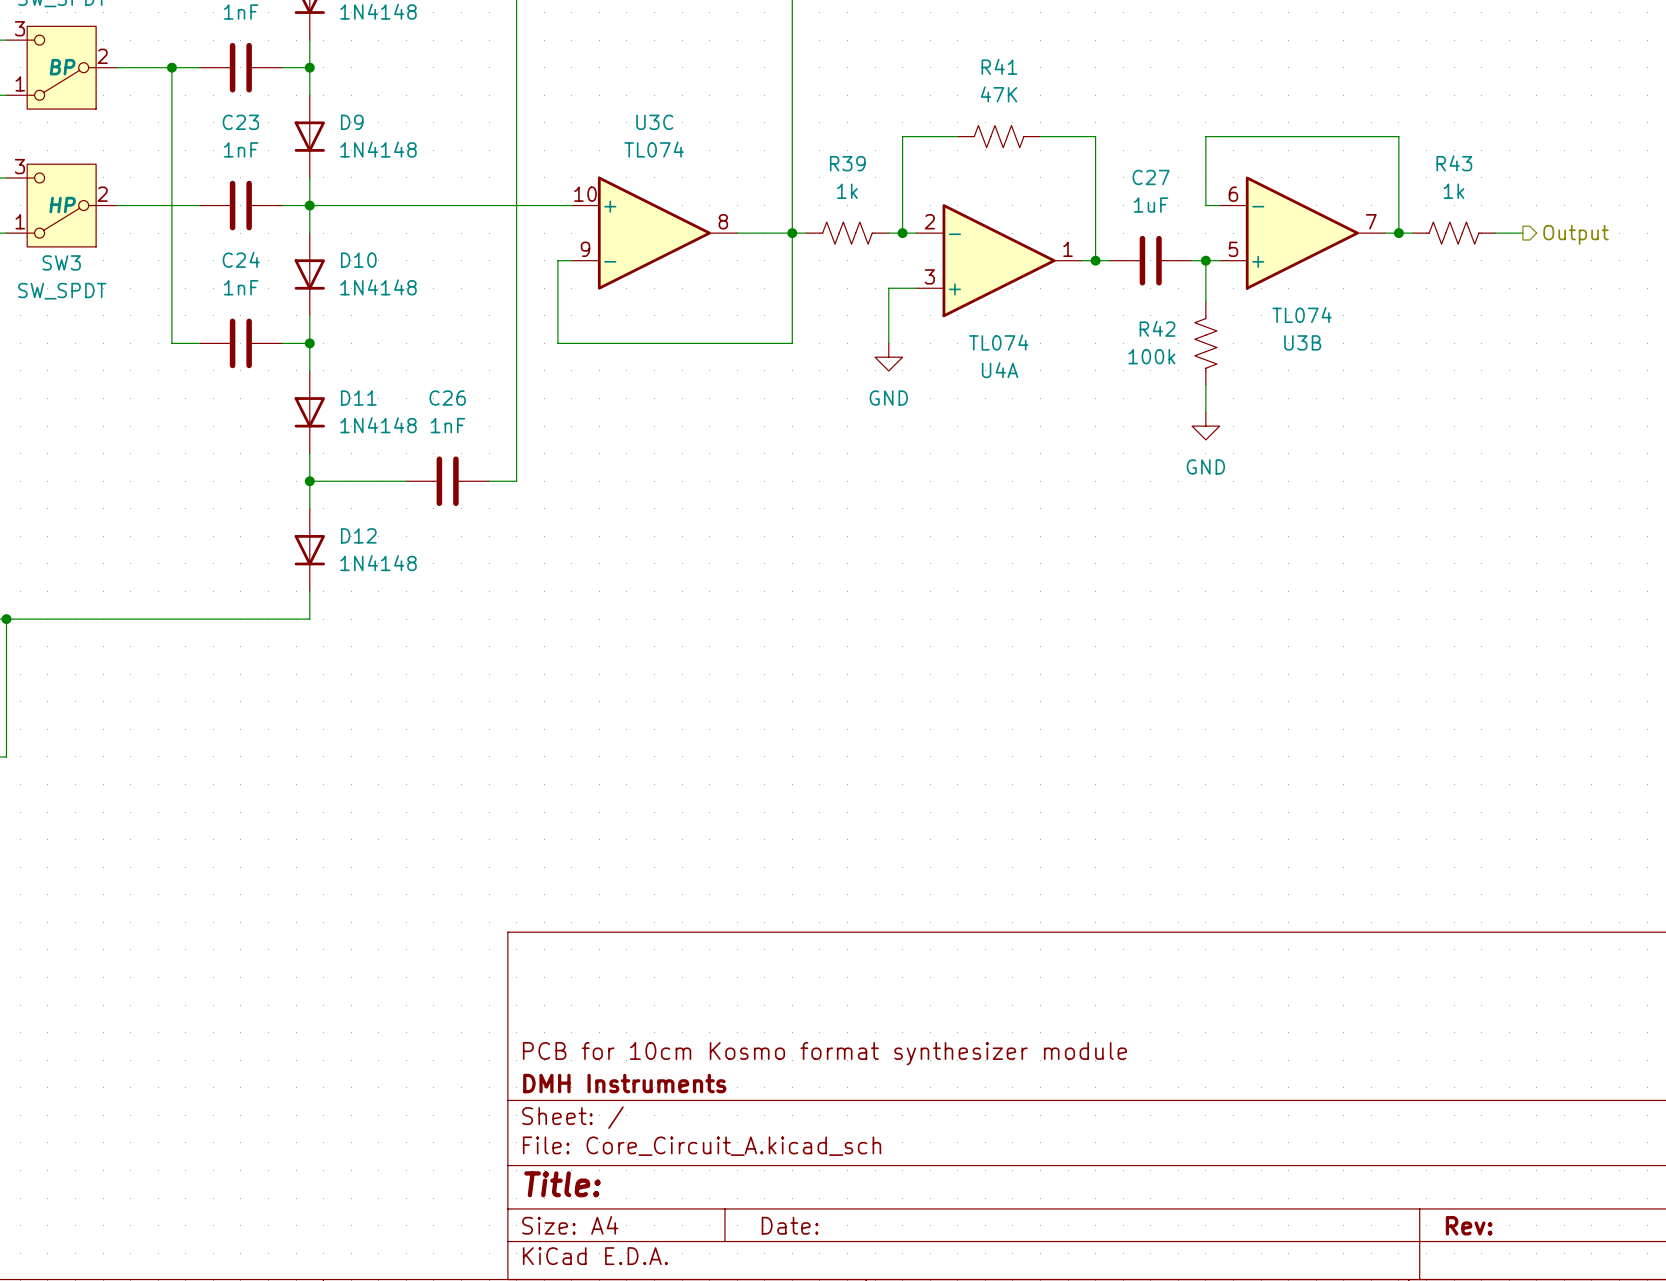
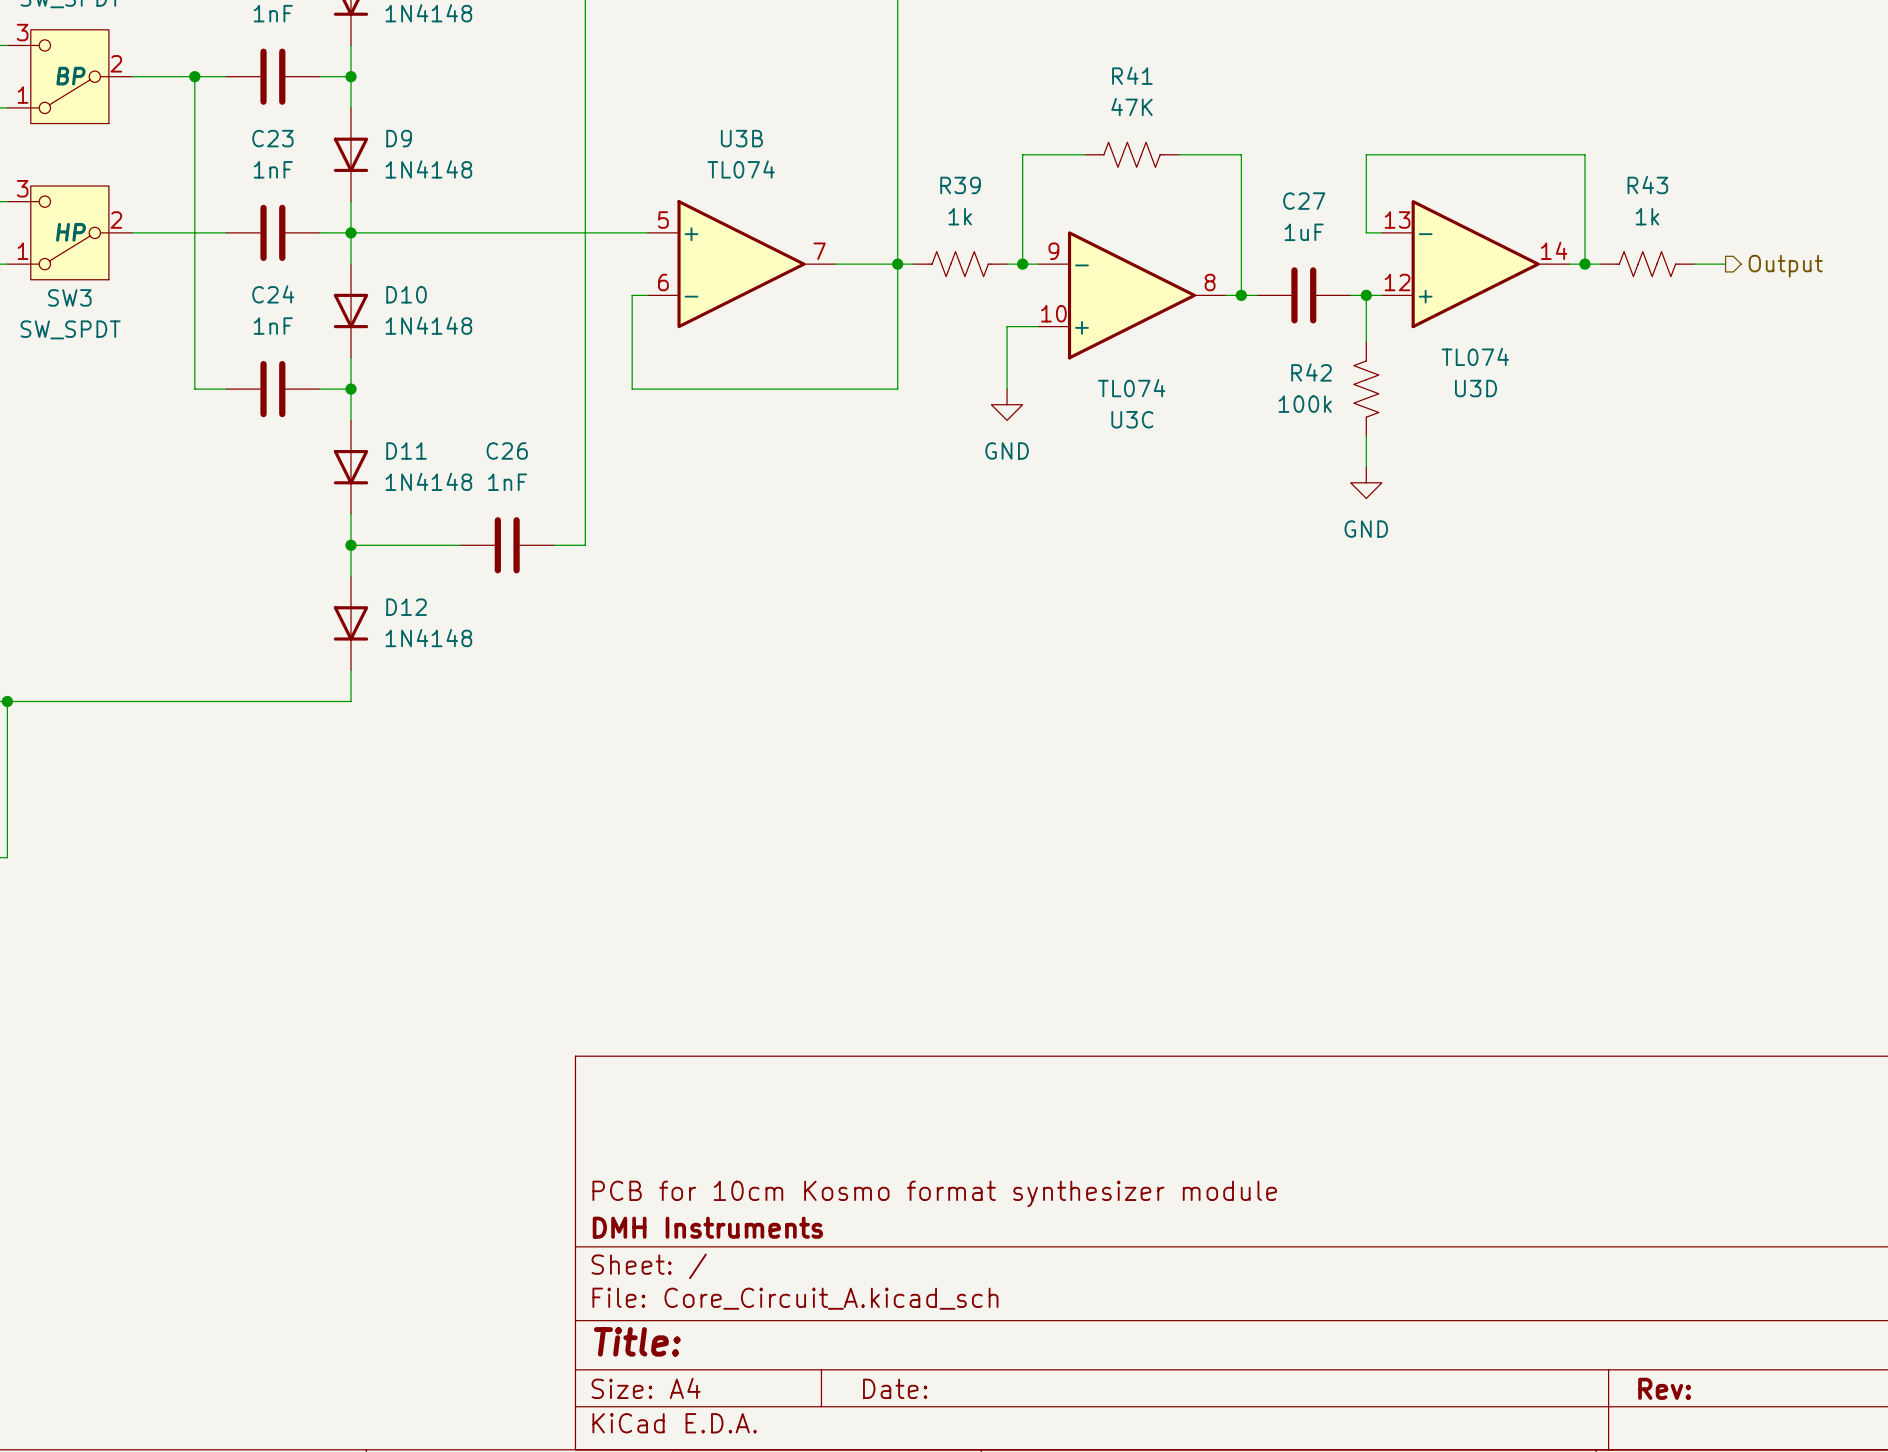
U3C flip: as is (654, 233) -> up-down (1132, 295)
U3C position: (654, 233) -> (1132, 295)
U3B flip: as is (1302, 233) -> up-down (741, 264)
U3B position: (1302, 233) -> (741, 264)
U3D: none -> TL074 (1475, 264)
U4A: TL074 (999, 260) -> none

